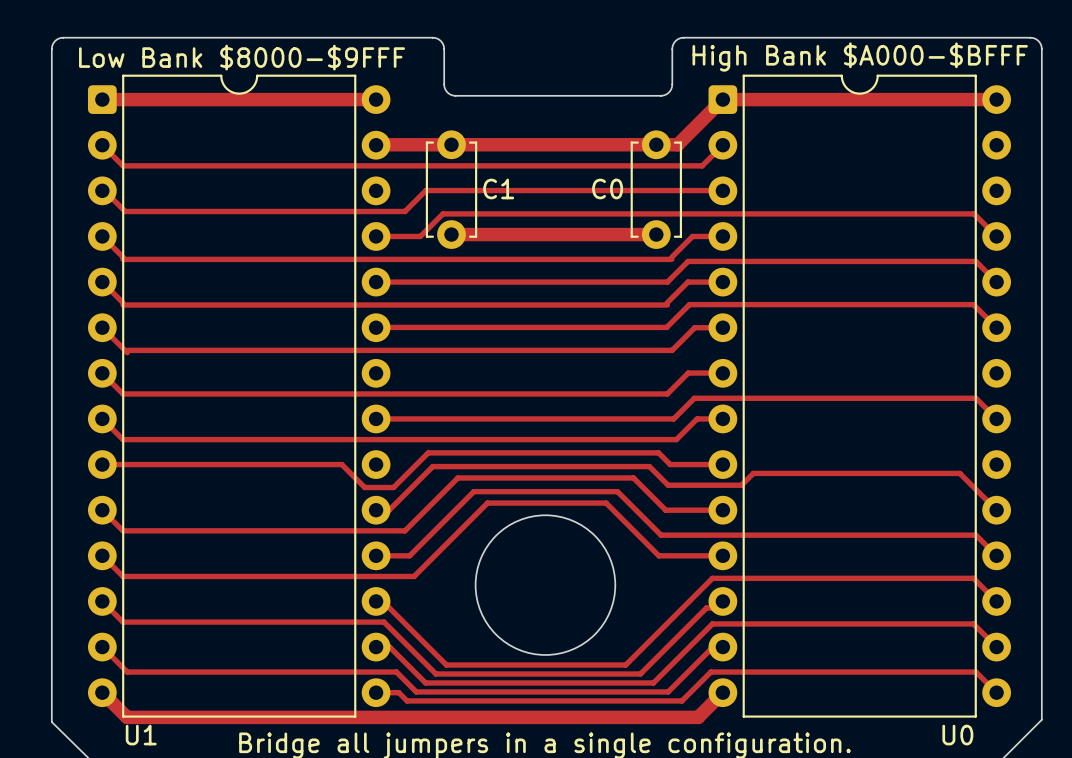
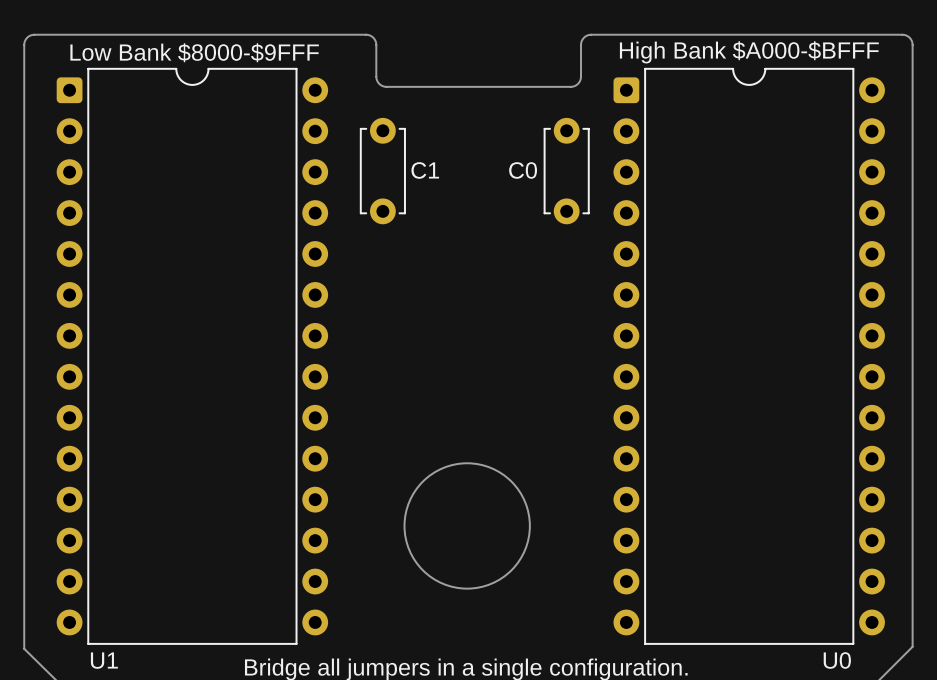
track: (102, 99) (376, 99) -> none
track: (996, 99) (722, 99) (677, 144) (376, 145) -> none
track: (102, 145) (123, 165) (702, 165) (722, 145) -> none
track: (102, 190) (104, 190) (125, 211) (404, 211) (425, 190) (722, 190) -> none
track: (451, 234) (656, 234) -> none
track: (102, 236) (123, 257) -> none
track: (376, 236) (420, 236) (442, 213) (974, 213) (996, 236) -> none
track: (722, 236) (692, 236) (671, 257) -> none
track: (123, 259) (671, 259) -> none
track: (102, 282) (123, 302) -> none
track: (376, 282) (667, 282) (688, 261) (975, 261) (996, 282) -> none
track: (722, 282) (687, 282) (667, 302) -> none
track: (123, 305) (667, 305) -> none
track: (102, 327) (127, 352) -> none
track: (376, 327) (666, 327) (689, 304) (973, 304) (996, 327) -> none
track: (722, 327) (694, 327) (672, 350) (127, 350) -> none
track: (102, 373) (123, 393) (667, 393) (688, 373) (722, 373) -> none
track: (102, 418) (123, 439) (676, 439) (697, 418) (722, 418) -> none
track: (376, 418) (673, 418) (694, 398) (975, 398) (996, 418) -> none
track: (102, 464) (341, 464) (364, 487) (393, 487) (428, 452) (658, 452) (670, 464) (722, 464) -> none
track: (102, 510) (123, 530) (404, 530) (457, 477) (633, 477) (665, 510) (722, 510) -> none
track: (376, 510) (389, 510) (432, 466) (649, 466) (668, 485) (741, 485) (753, 473) (959, 473) (996, 510) -> none
track: (102, 555) (123, 576) (414, 576) (487, 503) (606, 503) (658, 555) (722, 555) -> none
track: (376, 555) (409, 555) (473, 491) (617, 491) (661, 535) (975, 535) (996, 555) -> none
track: (102, 601) (123, 622) (384, 622) (435, 674) (640, 674) (706, 608) (715, 608) (722, 601) -> none
track: (376, 601) (382, 601) (446, 665) (625, 665) (712, 578) (973, 578) (996, 601) -> none
track: (102, 647) (127, 672) (396, 672) (416, 691) (668, 691) (713, 647) (722, 647) -> none
track: (376, 647) (389, 647) (425, 682) (653, 682) (712, 623) (973, 623) (996, 647) -> none
track: (102, 692) (127, 717) (698, 717) (722, 692) -> none
track: (376, 692) (398, 692) (407, 700) (681, 700) (710, 672) (975, 672) (996, 692) -> none

